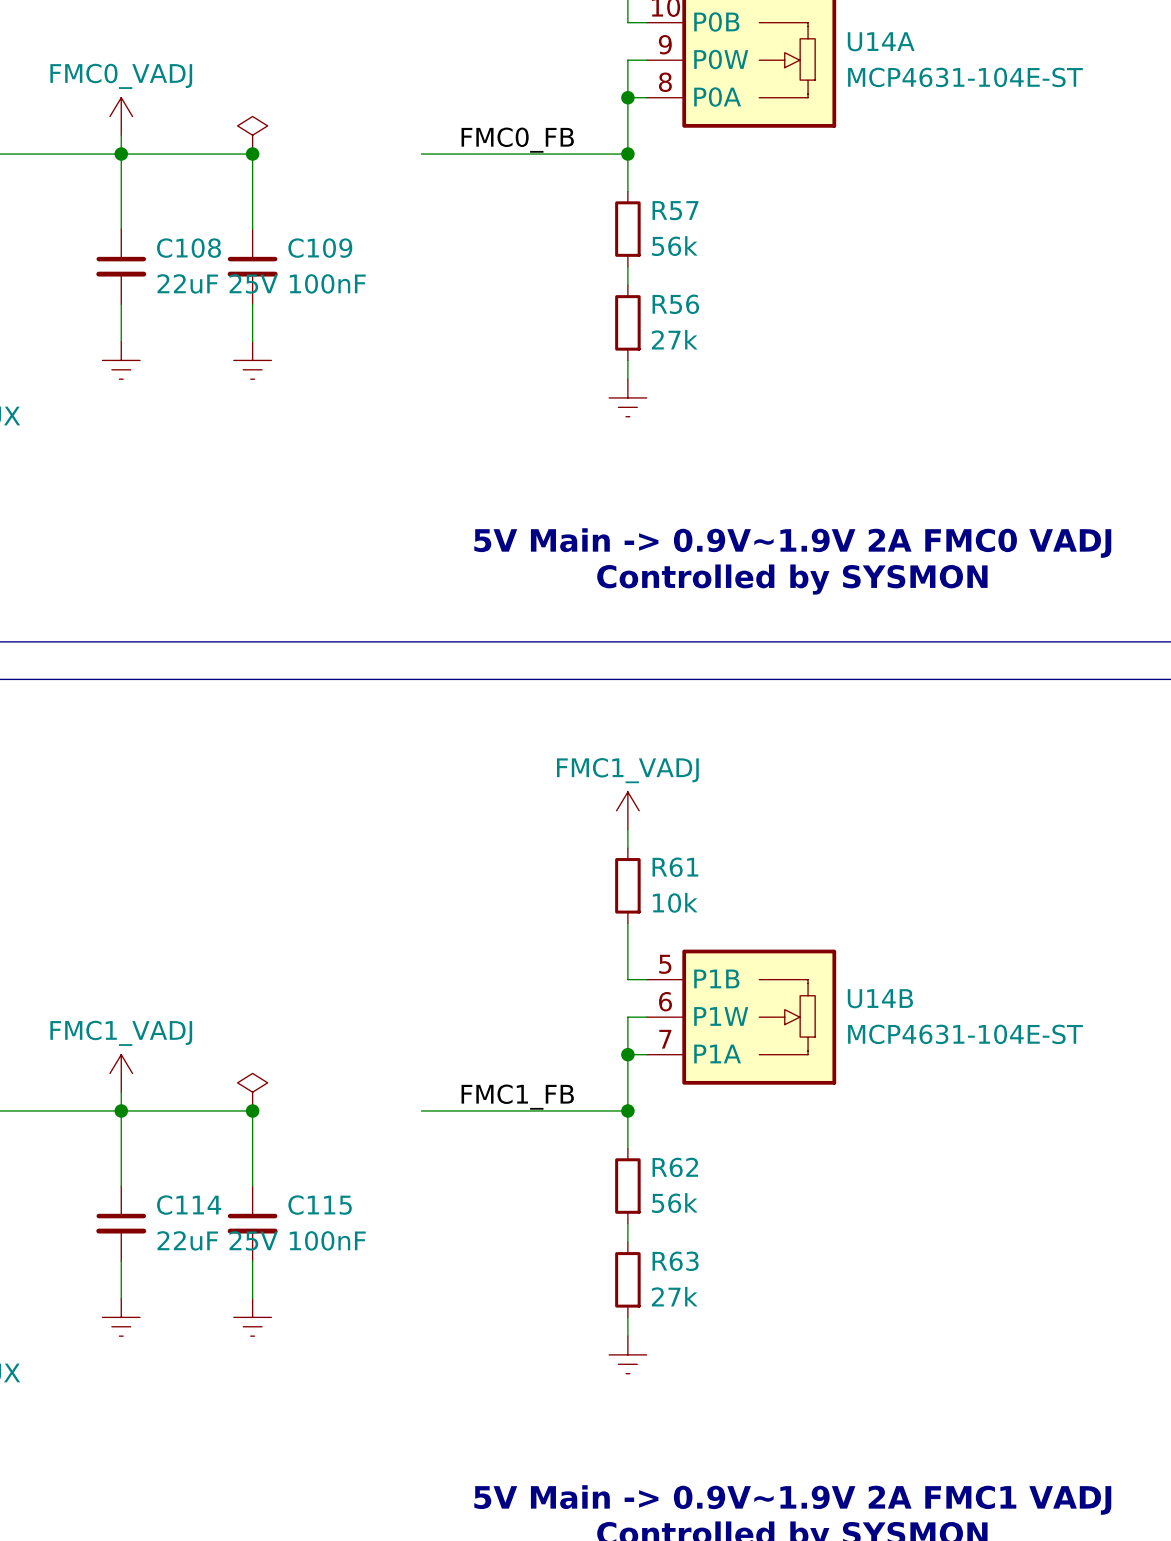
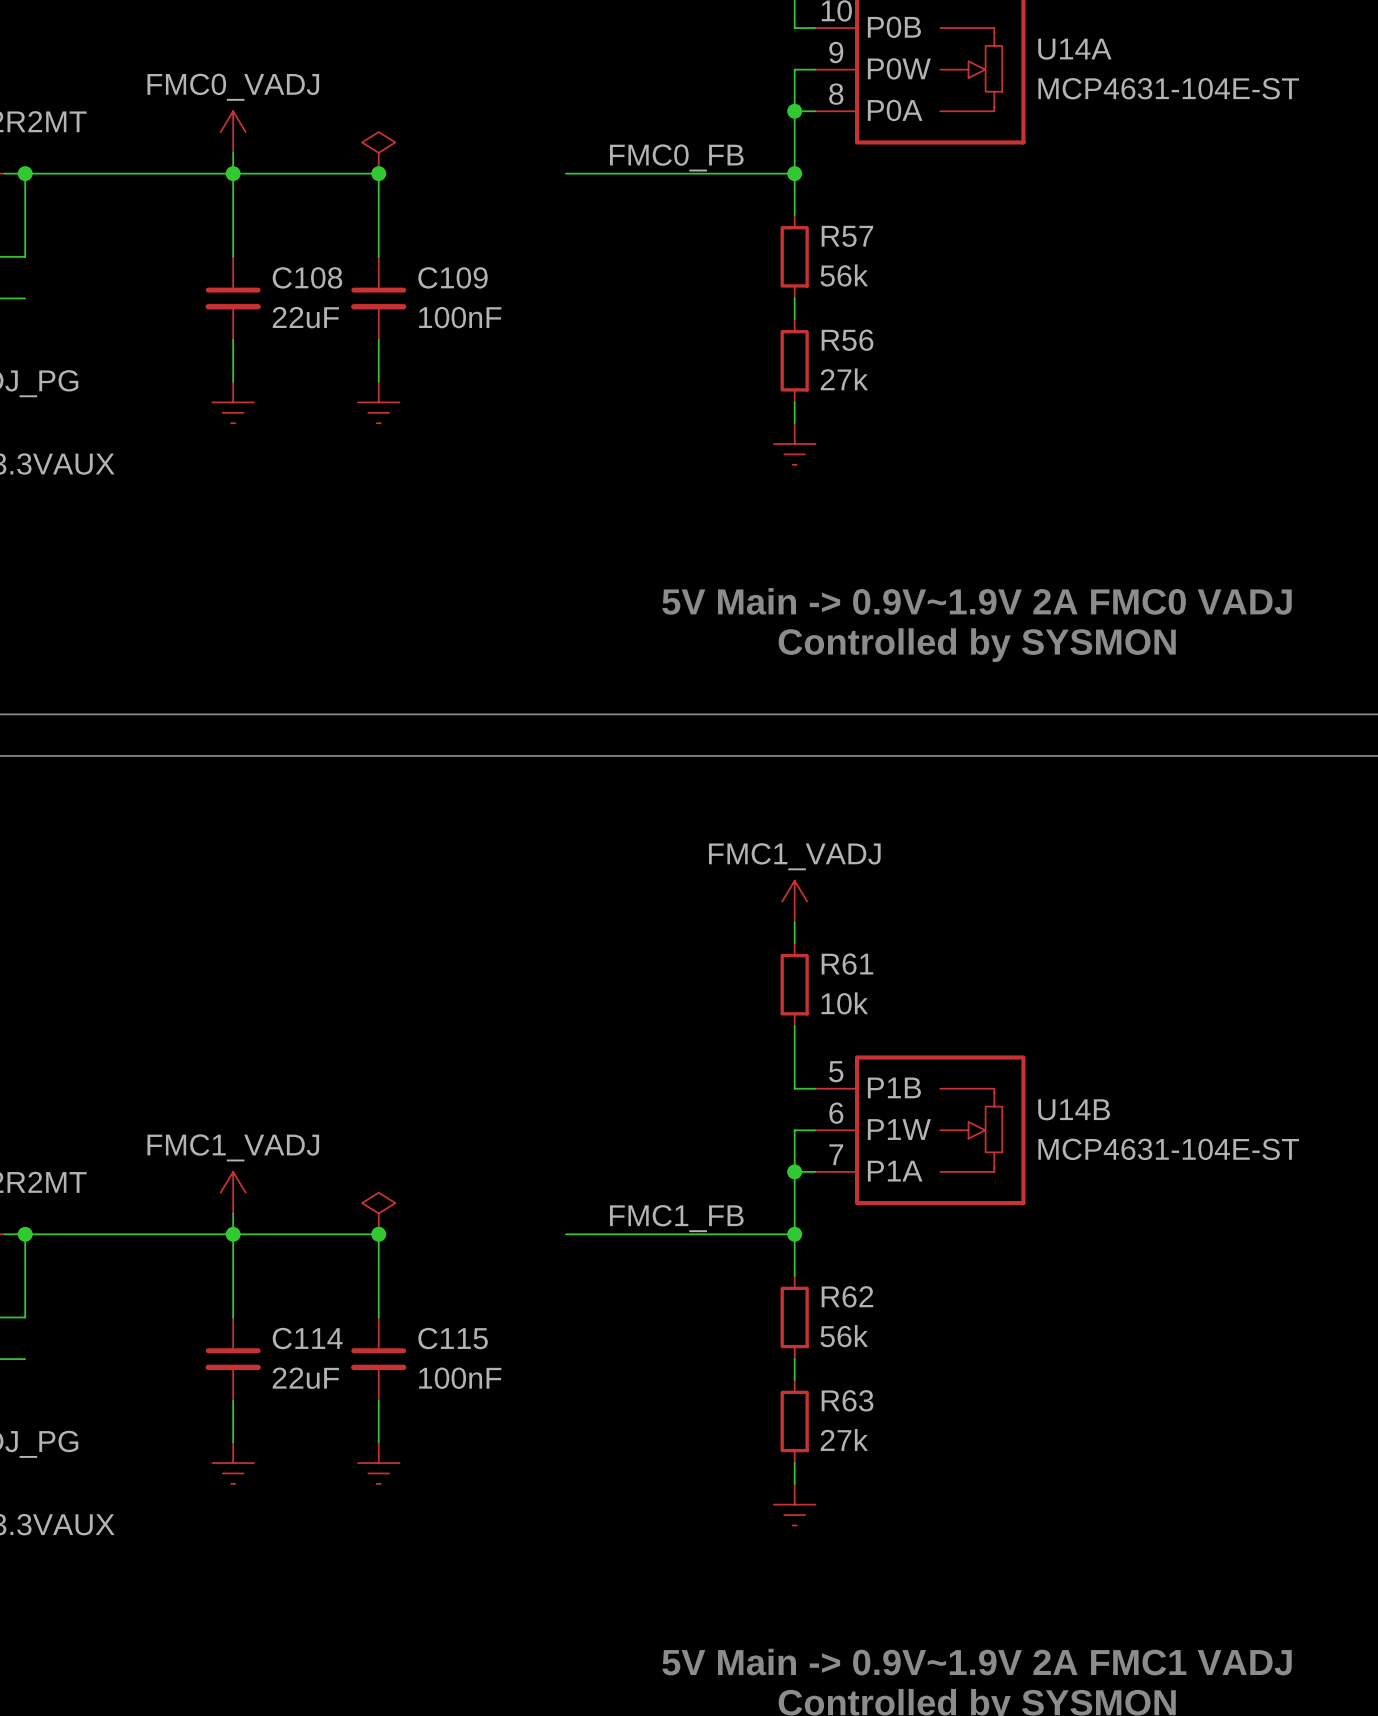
C108 value: 22uF 25V (217, 283) -> 22uF (305, 317)
C114 value: 22uF 25V (217, 1240) -> 22uF (305, 1378)

